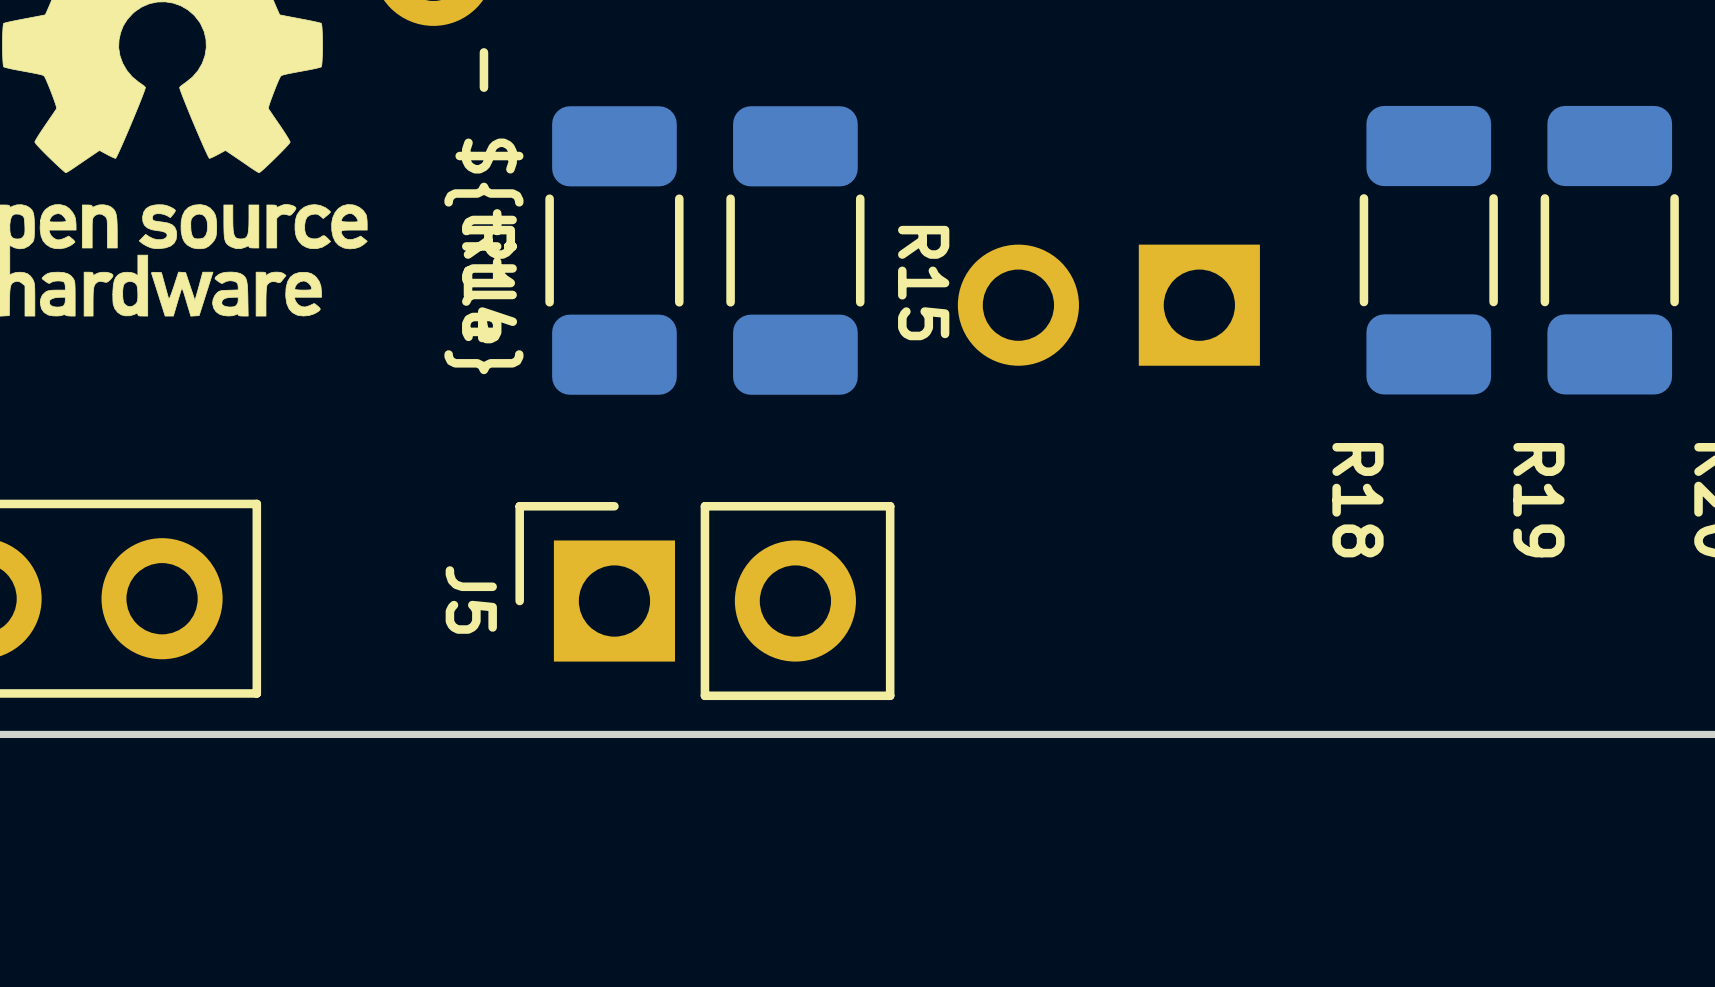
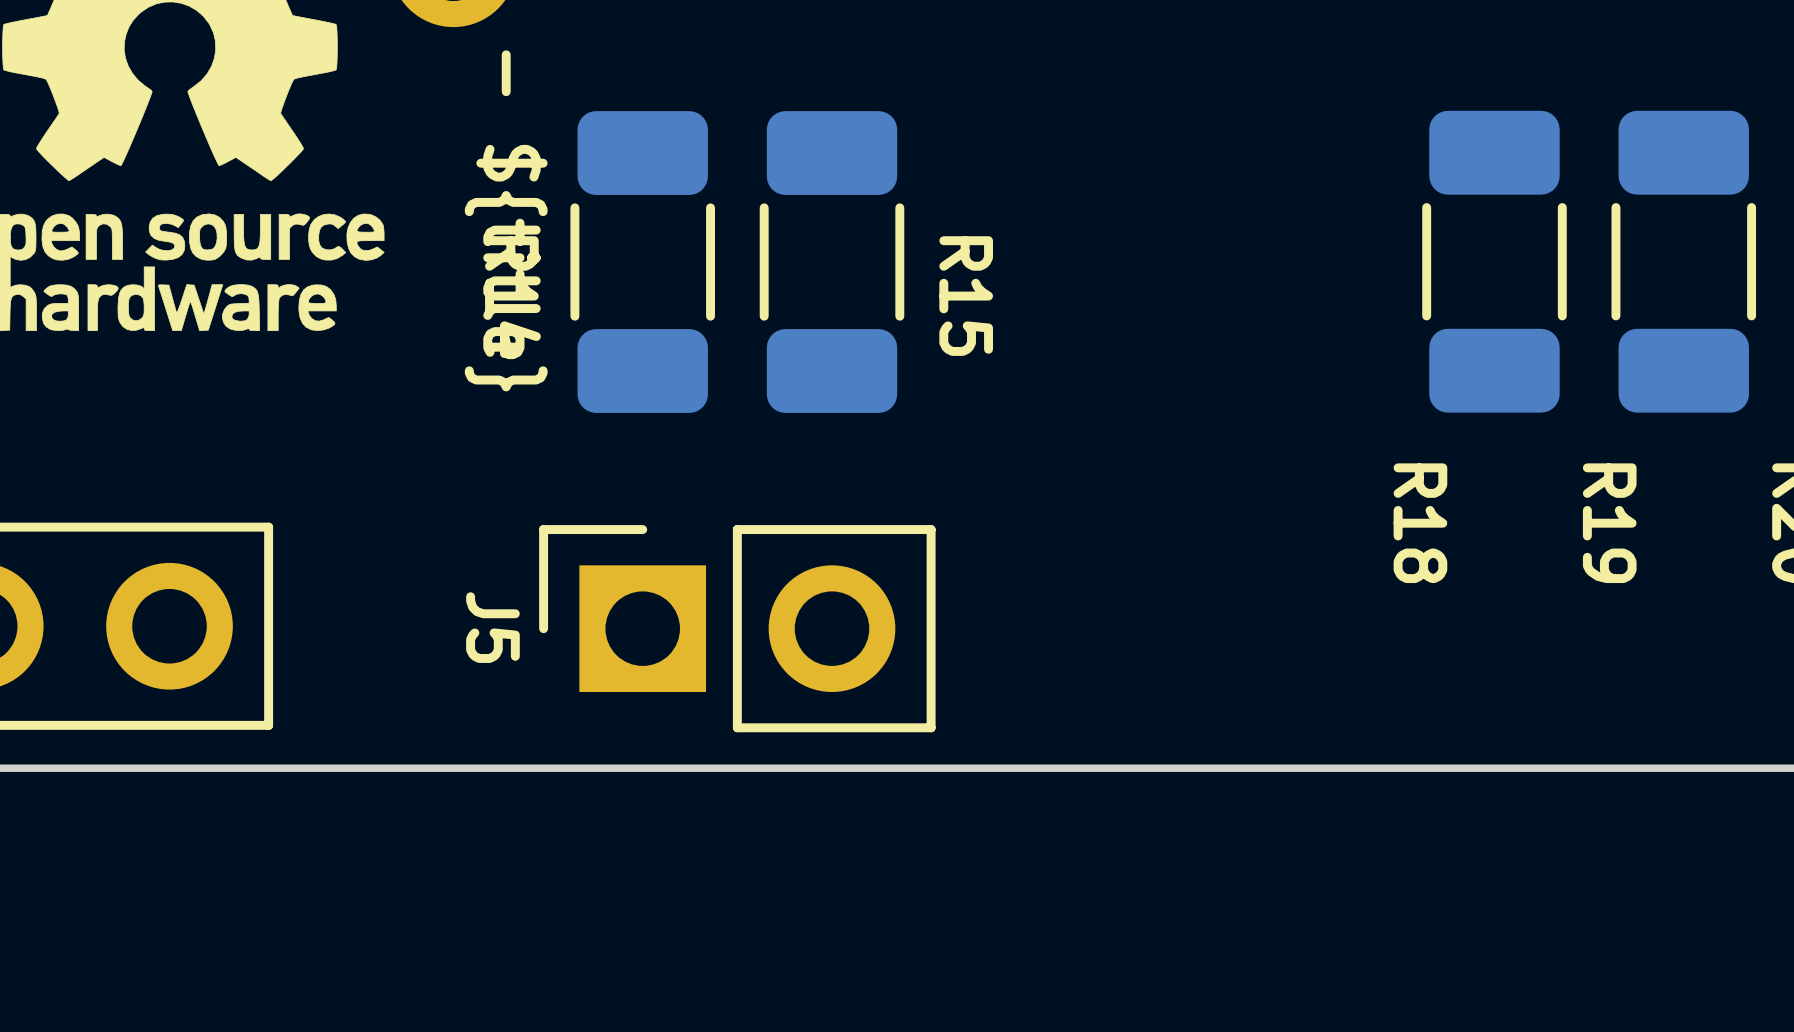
part: (1108, 305) -> none

